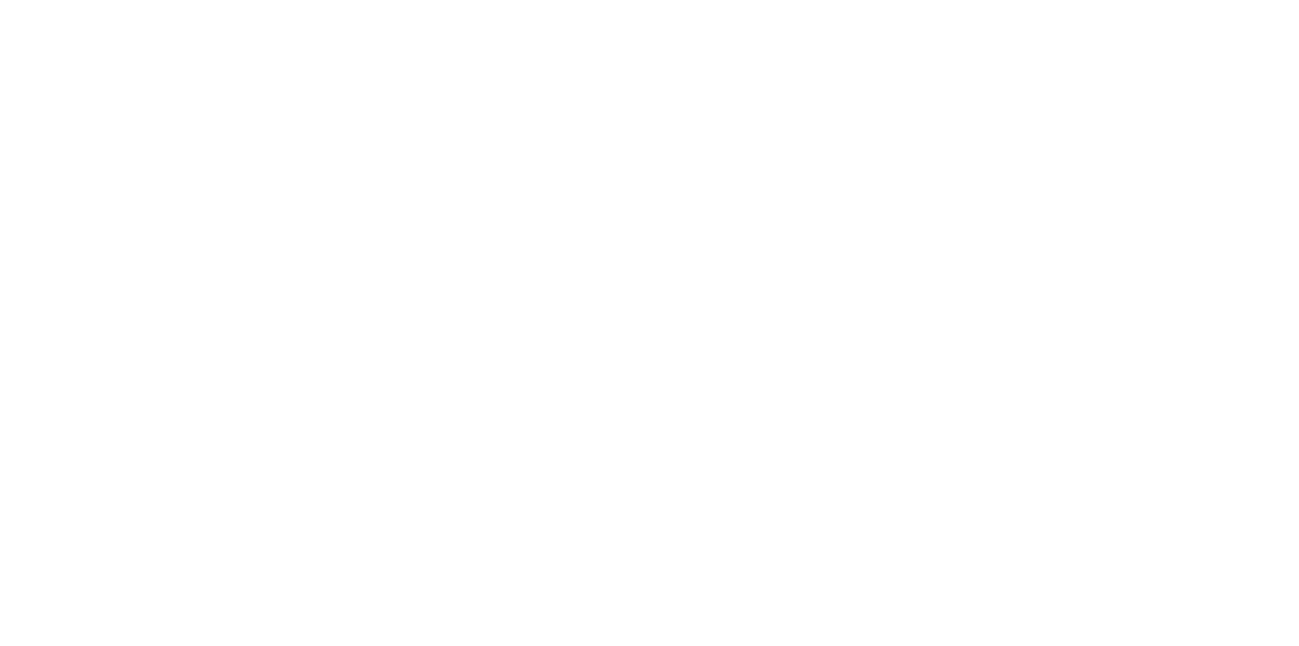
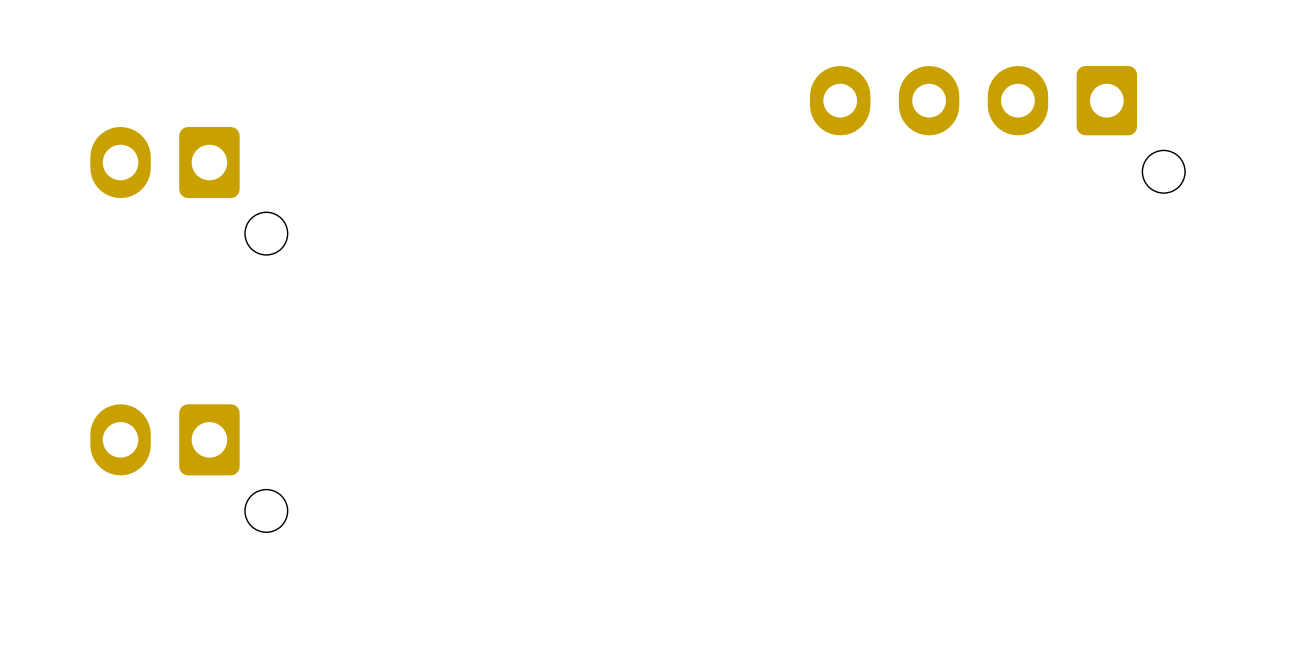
part: none -> (997, 129)
part: none -> (189, 190)
part: none -> (189, 468)

